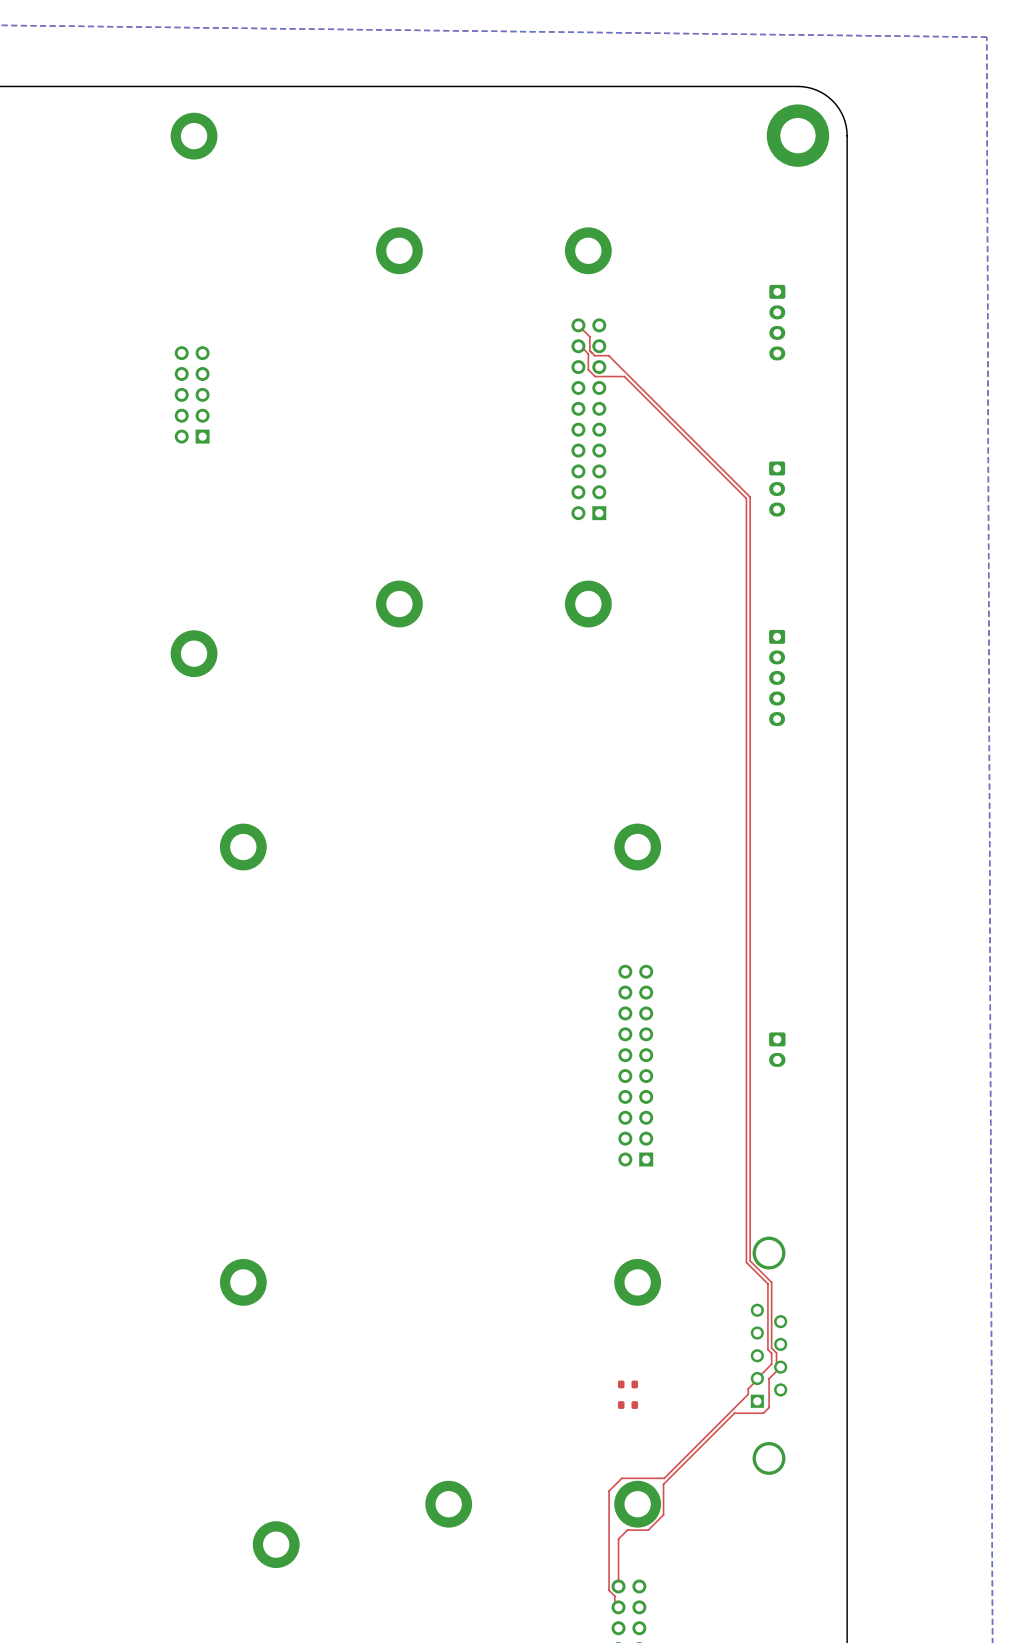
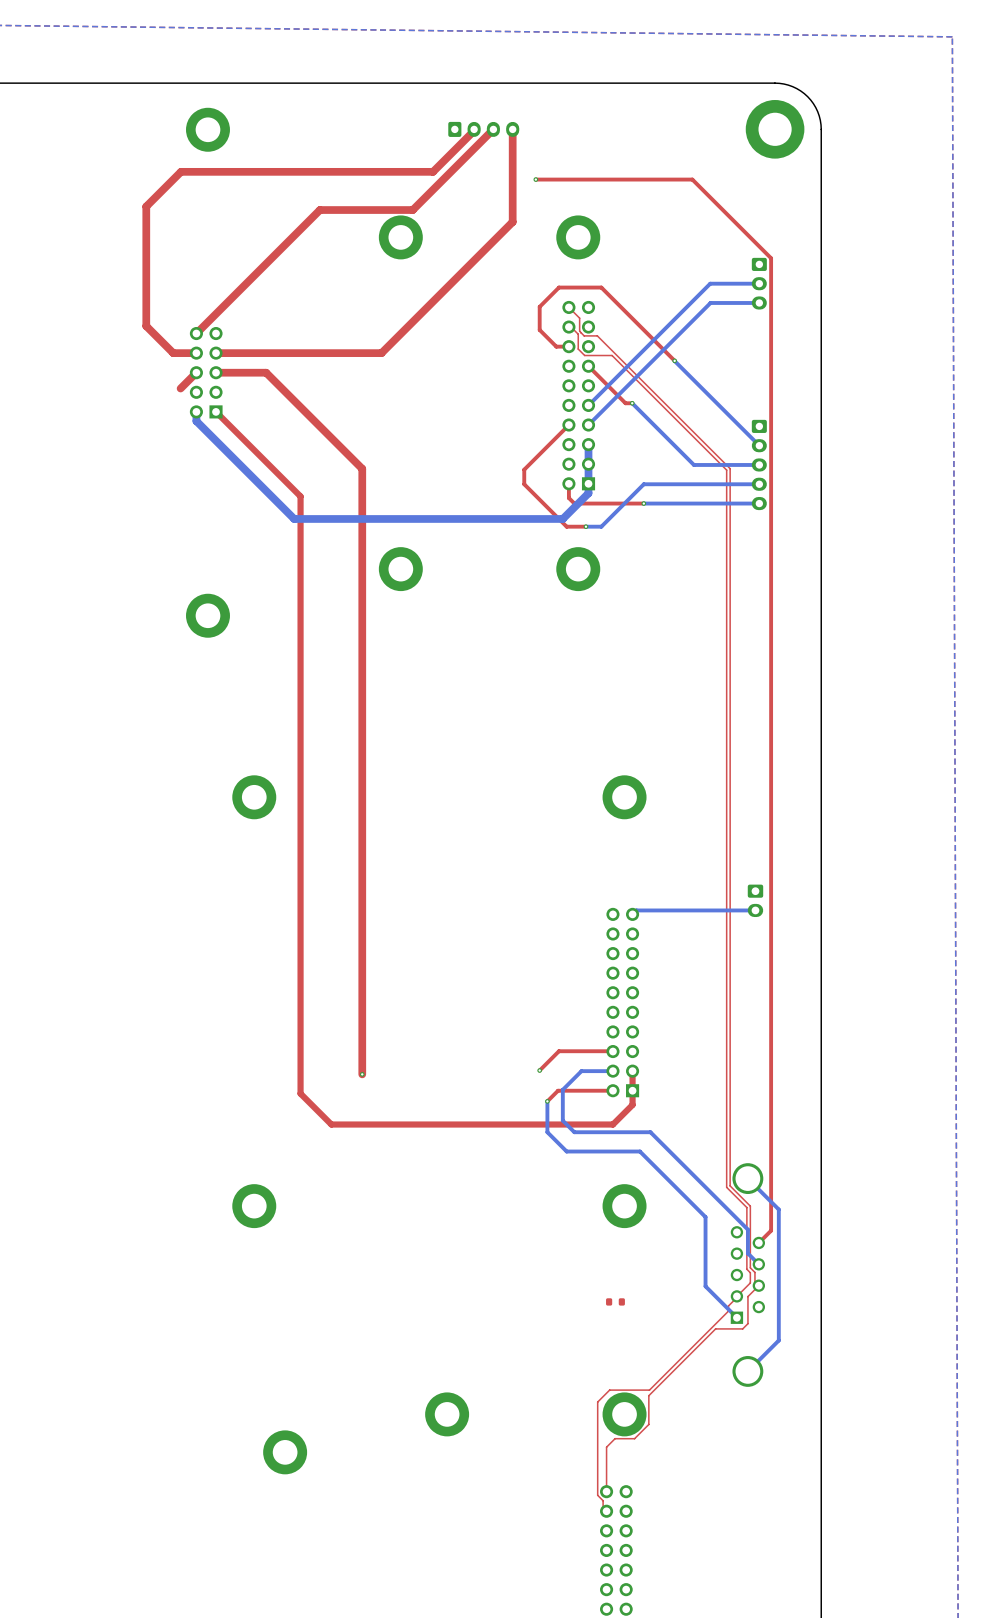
top track: none -> (474, 129) (433, 171) (180, 171) (146, 206) (146, 326) (173, 353) (196, 353)
part: none -> (483, 129)
top track: none -> (493, 129) (412, 210) (319, 210) (196, 333)
top track: none -> (512, 129) (512, 221) (381, 353) (216, 353)
top track: none -> (535, 179) (692, 179) (771, 258) (771, 1230) (758, 1242)
via: none -> (535, 179)
bottom track: none -> (759, 283) (710, 283) (588, 405)
part: none -> (759, 283)
bottom track: none -> (759, 302) (710, 302) (588, 425)
part: (777, 322) -> none
top track: none -> (568, 346) (556, 346) (539, 329) (539, 306) (558, 287) (601, 287) (674, 360)
bottom track: none -> (674, 360) (759, 445)
via: none -> (674, 360)
top track: none -> (588, 366) (625, 403) (632, 403)
top track: none -> (196, 372) (180, 388)
top track: none -> (216, 372) (266, 372) (362, 468) (362, 1074)
bottom track: none -> (632, 403) (693, 464) (759, 464)
via: none -> (632, 403)
top track: none -> (215, 410) (300, 496) (300, 1093) (331, 1124) (612, 1124) (632, 1104) (632, 1071)
bottom track: none -> (196, 411) (196, 421) (294, 518) (562, 518) (588, 493) (588, 444)
top track: none -> (568, 425) (524, 469) (524, 484) (566, 526) (585, 526)
part footprint: [769, 461, 786, 517] -> [751, 419, 767, 511]
top track: none -> (568, 483) (568, 498) (574, 503) (643, 503)
bottom track: none -> (759, 484) (643, 484) (601, 526) (585, 526)
via: none -> (643, 503)
bottom track: none -> (759, 503) (643, 503)
via: none -> (585, 526)
part: (777, 677) -> none
bottom track: none -> (755, 910) (636, 910) (632, 914)
part position: (777, 1049) -> (755, 900)
top track: none -> (612, 1051) (558, 1051) (539, 1070)
via: none -> (539, 1070)
bottom track: none -> (612, 1071) (581, 1071) (562, 1089) (562, 1120) (574, 1132) (650, 1132) (747, 1229) (747, 1253) (758, 1264)
via: none -> (362, 1074)
top track: none -> (612, 1090) (558, 1090) (547, 1101)
bottom track: none -> (547, 1101) (547, 1132) (566, 1151) (639, 1151) (705, 1217) (705, 1286) (736, 1317)
via: none -> (547, 1101)
bottom track: none -> (747, 1178) (778, 1209) (778, 1340) (747, 1371)
part: (628, 1405) -> none

